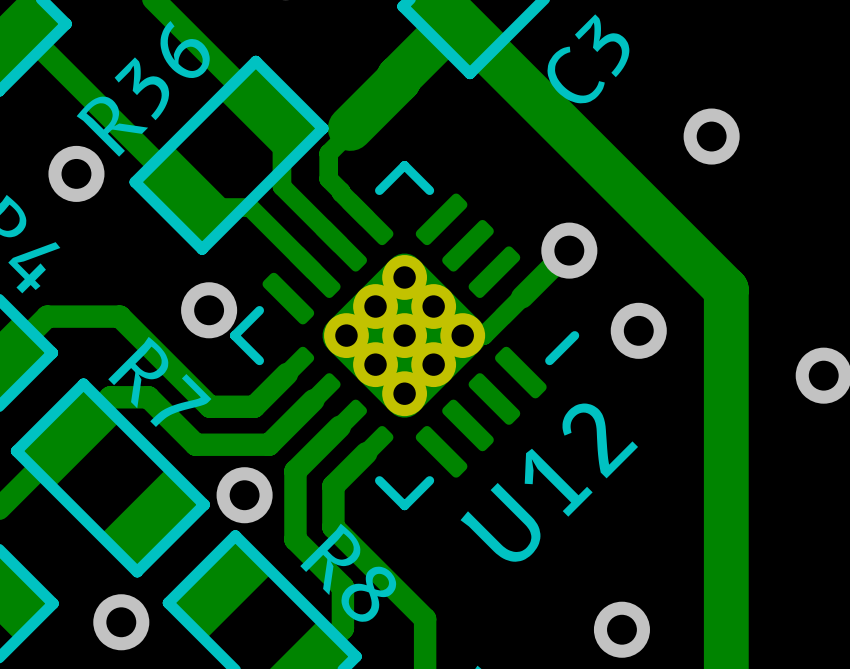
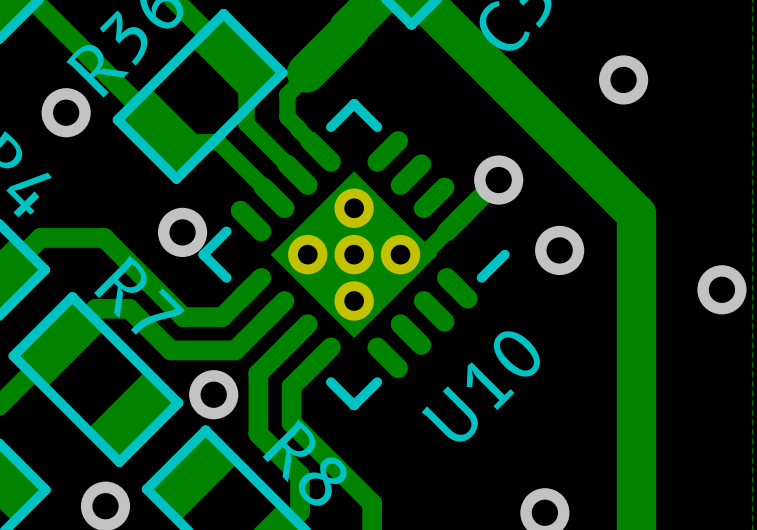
U12: (404, 335) -> none
U10: none -> (354, 254)

